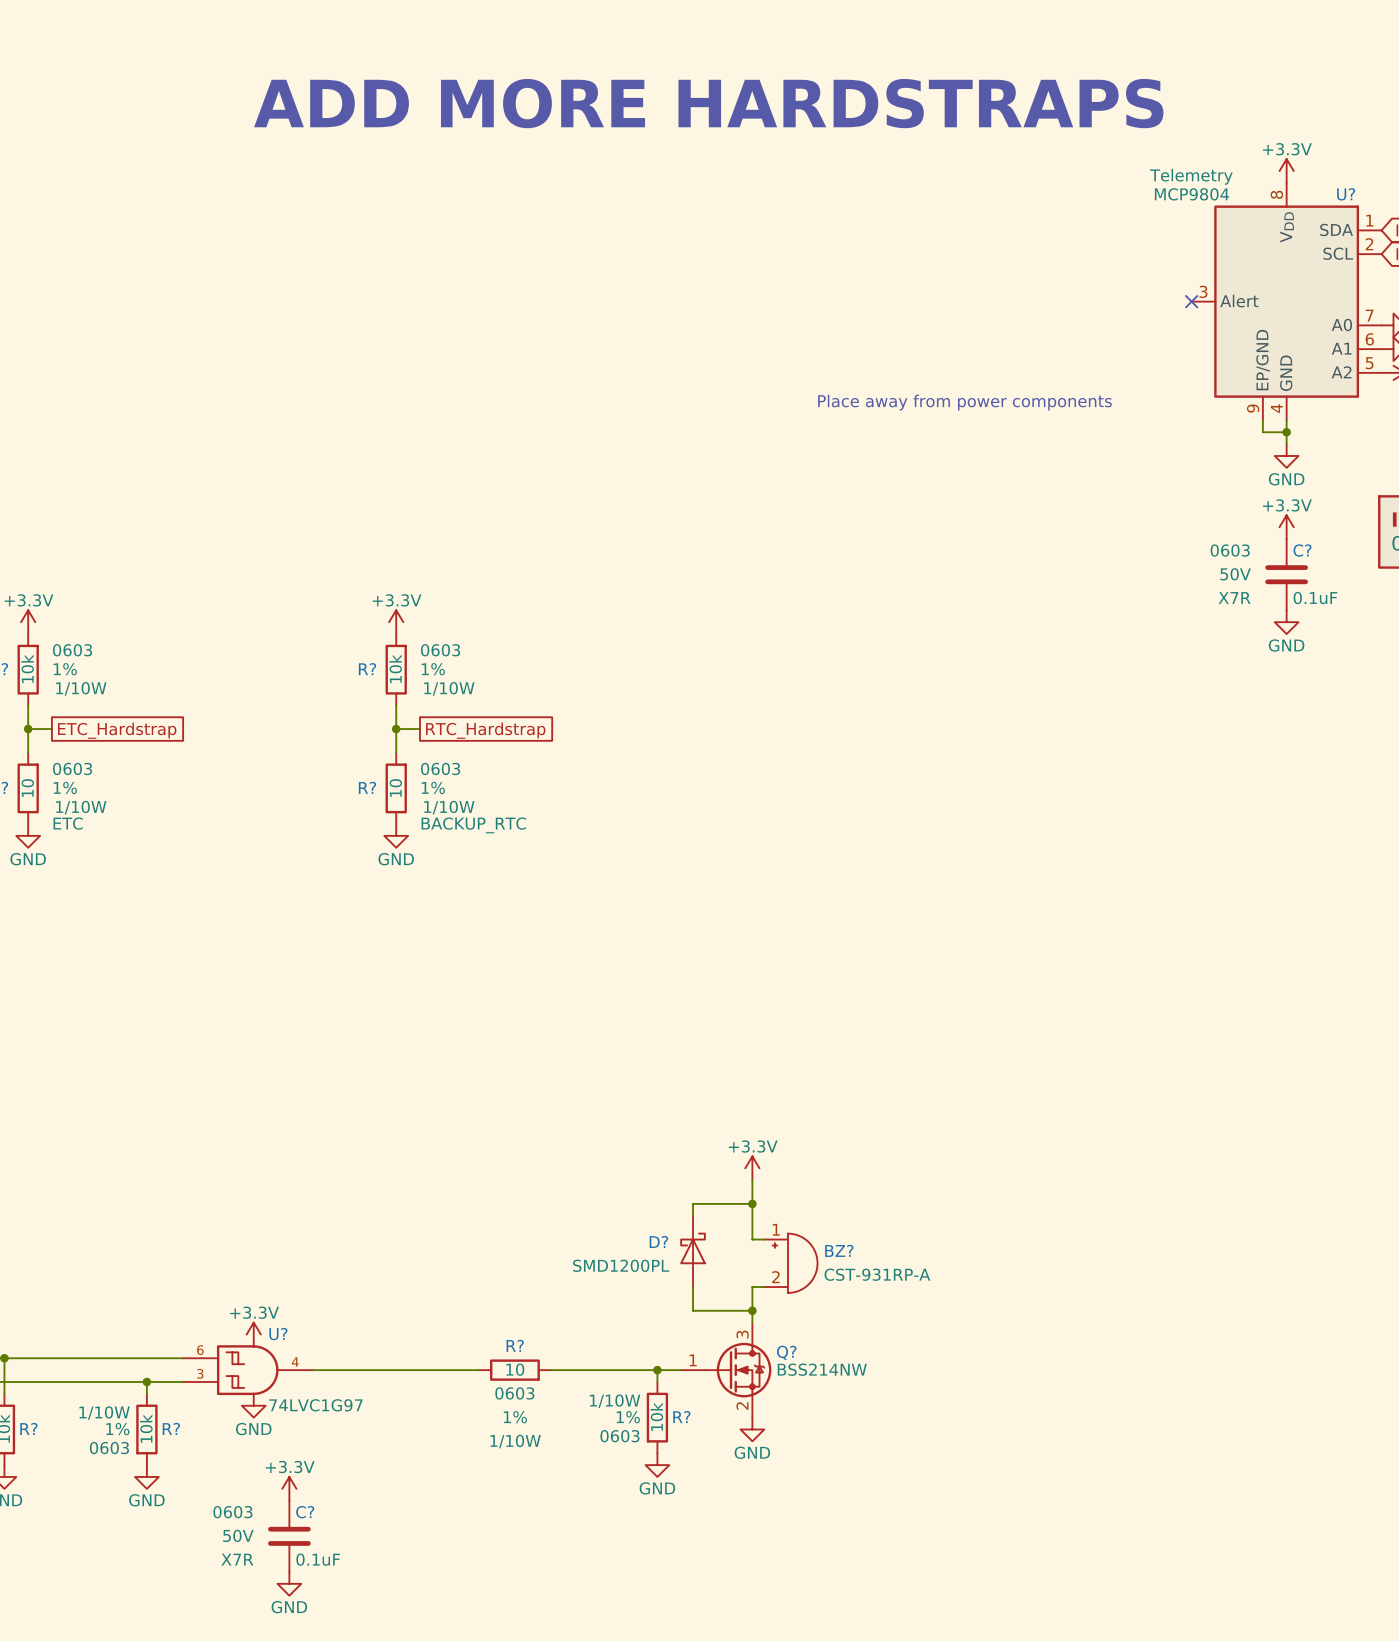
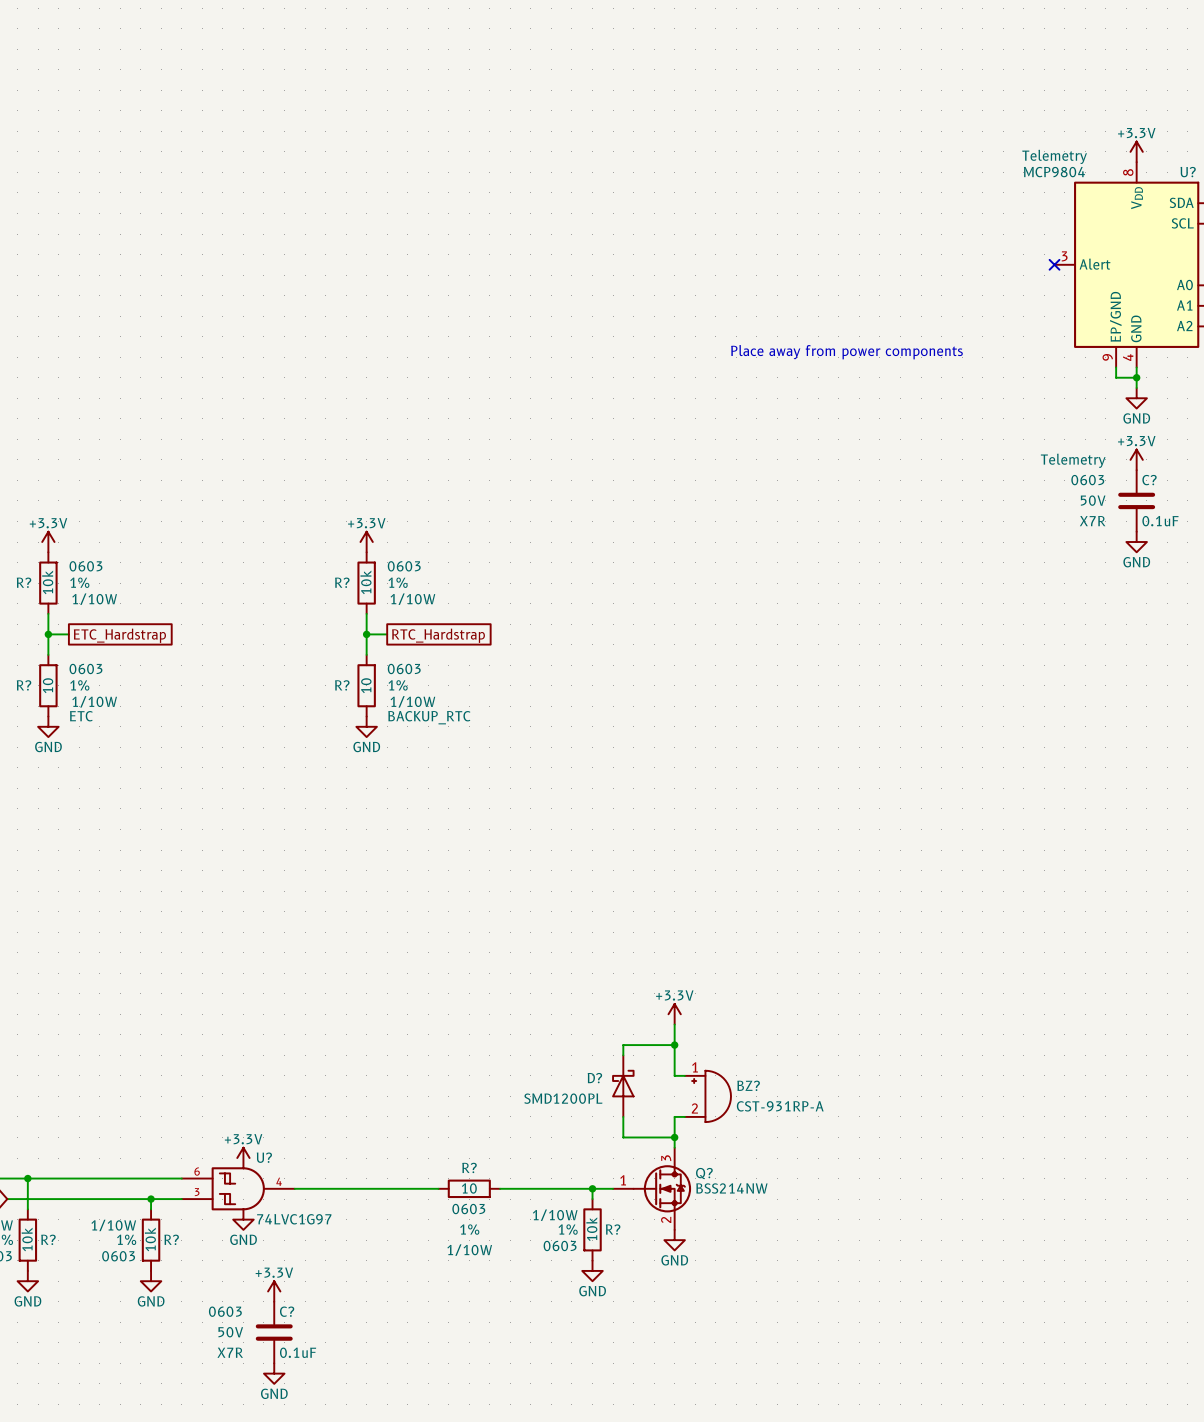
text: ADD MORE HARDSTRAPS (708, 103) -> none
C? text: none -> Telemetry (1073, 460)

